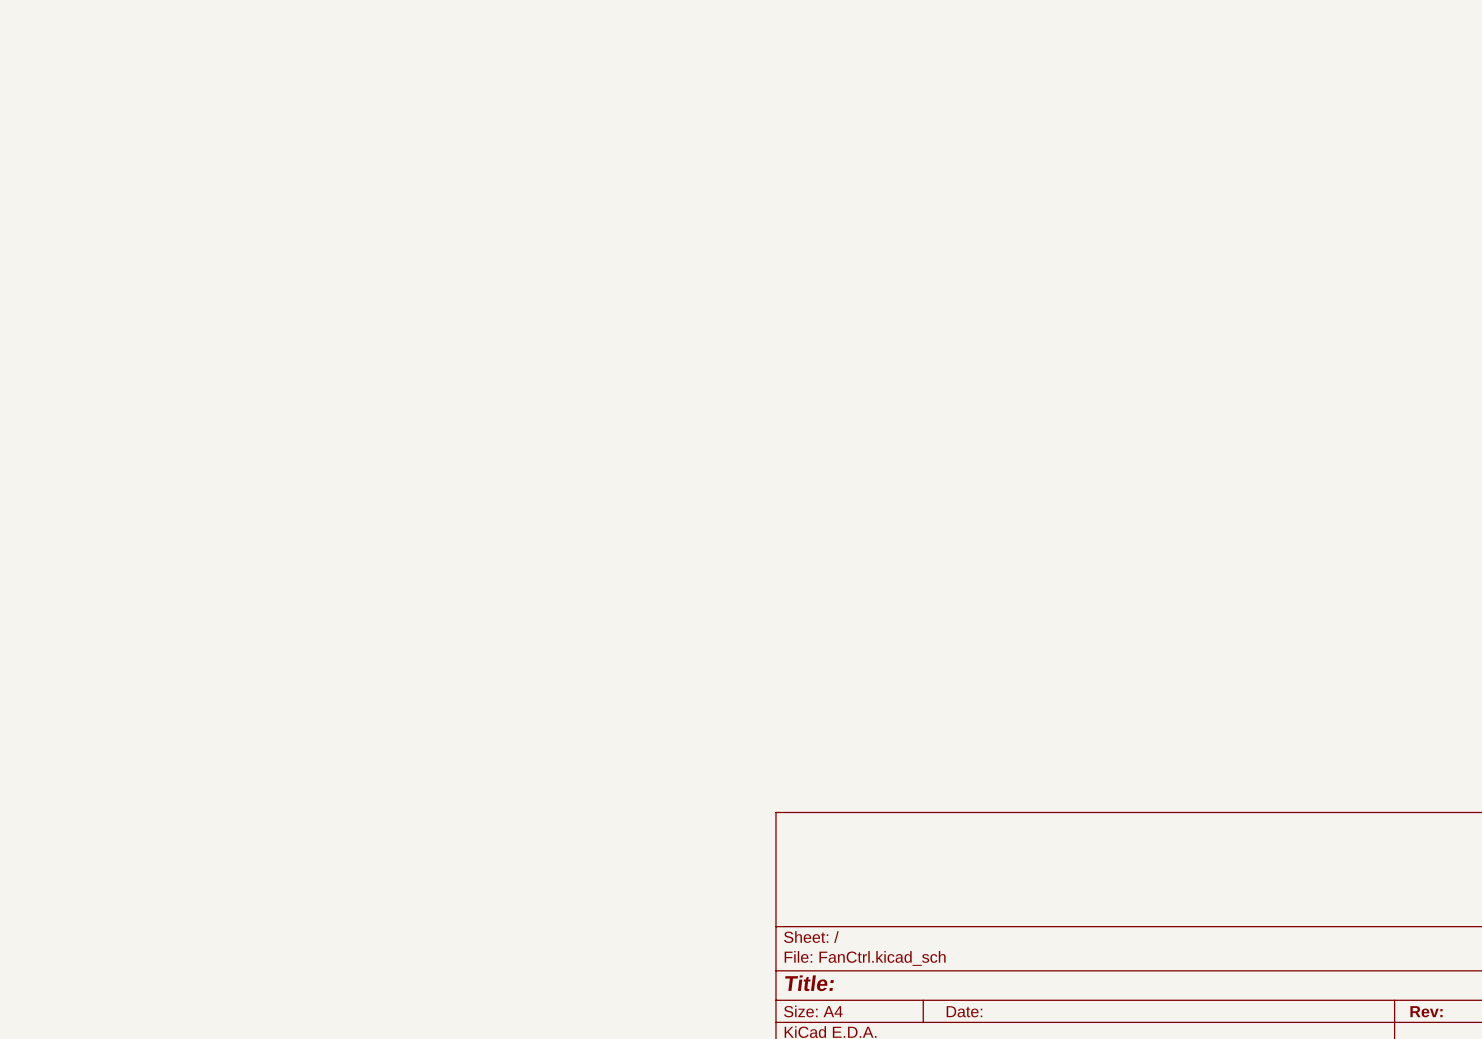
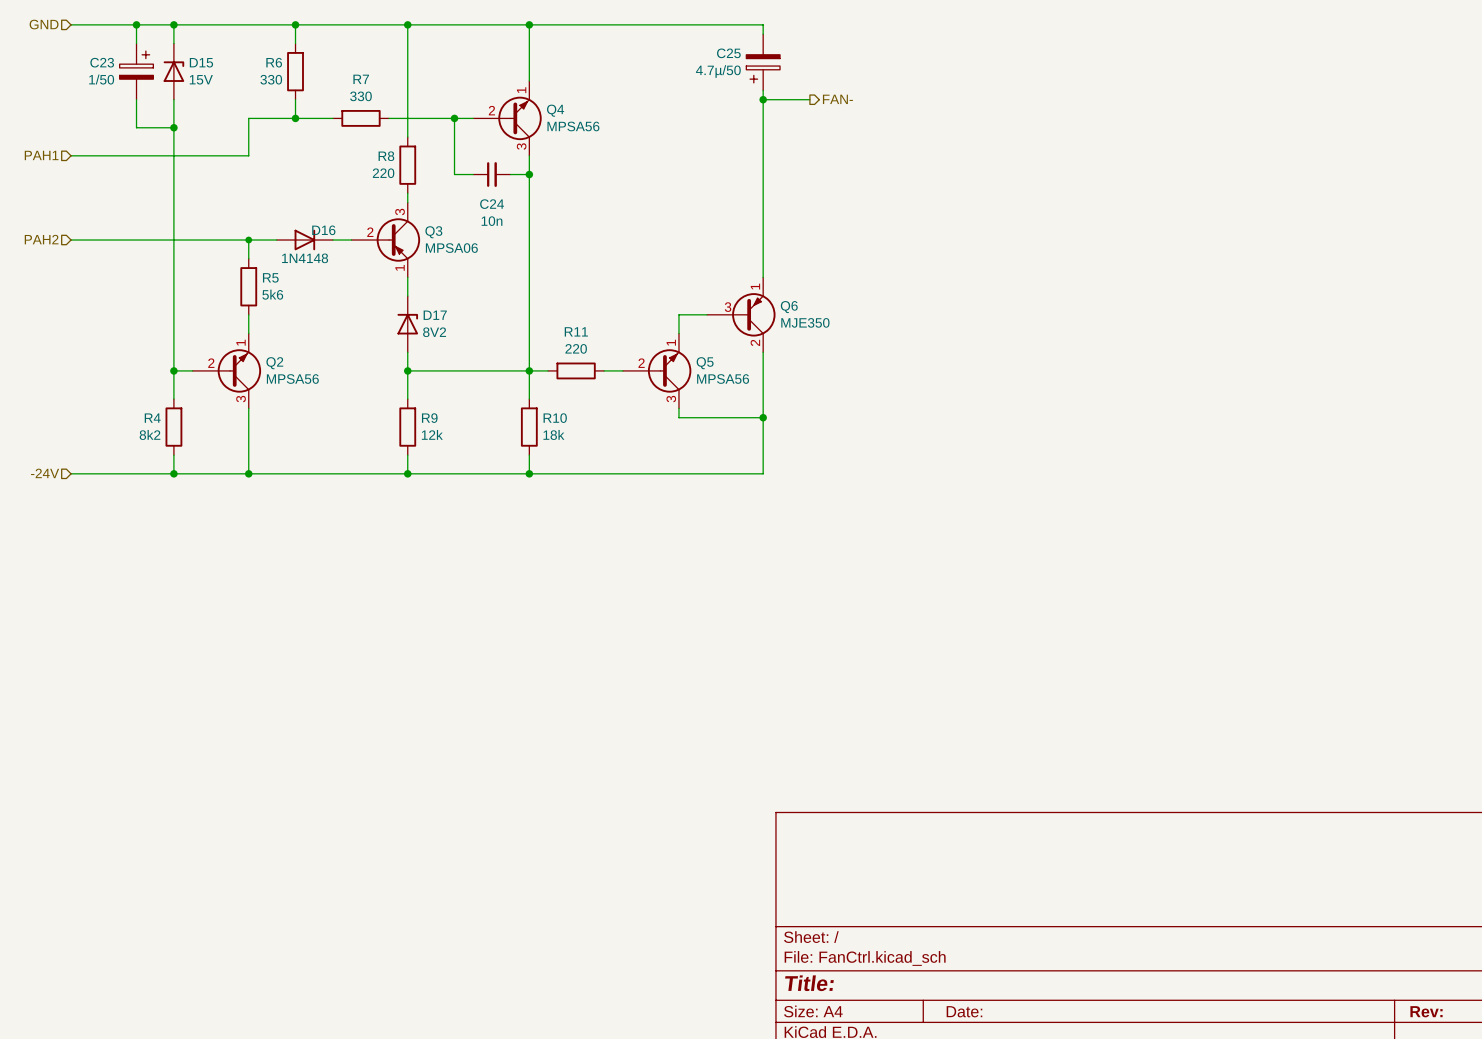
hierarchical label: none -> GND (44, 24)
wire: none -> (71, 24) (763, 24) (763, 34)
wire: none -> (136, 24) (136, 43)
junction: none -> (136, 24)
wire: none -> (173, 24) (173, 43)
junction: none -> (173, 24)
wire: none -> (295, 24) (295, 43)
junction: none -> (295, 24)
wire: none -> (407, 24) (407, 137)
junction: none -> (407, 24)
wire: none -> (529, 24) (529, 81)
junction: none -> (529, 24)
C25: none -> 4.7µ/50 (763, 62)
C23: none -> 1/50 (136, 71)
D15: none -> 15V (173, 71)
R6: none -> 330 (295, 71)
wire: none -> (763, 90) (763, 277)
wire: none -> (136, 99) (136, 127) (173, 127)
wire: none -> (173, 99) (173, 399)
wire: none -> (295, 99) (295, 118)
wire: none -> (763, 99) (809, 99)
junction: none -> (763, 99)
hierarchical label: none -> FAN- (837, 99)
junction: none -> (295, 118)
wire: none -> (332, 118) (248, 118) (248, 155) (71, 155)
R7: none -> 330 (360, 118)
wire: none -> (389, 118) (473, 118)
wire: none -> (454, 118) (454, 174) (473, 174)
junction: none -> (454, 118)
Q4: none -> MPSA56 (507, 118)
junction: none -> (173, 127)
hierarchical label: none -> PAH1 (41, 155)
wire: none -> (529, 155) (529, 399)
R8: none -> 220 (407, 165)
C24: none -> 10n (491, 174)
wire: none -> (510, 174) (529, 174)
junction: none -> (529, 174)
wire: none -> (407, 193) (407, 202)
hierarchical label: none -> PAH2 (41, 239)
wire: none -> (71, 240) (276, 240)
wire: none -> (248, 240) (248, 258)
junction: none -> (248, 240)
D16: none -> 1N4148 (304, 240)
wire: none -> (332, 240) (351, 240)
Q3: none -> MPSA06 (385, 240)
wire: none -> (407, 277) (407, 296)
R5: none -> 5k6 (248, 286)
wire: none -> (248, 314) (248, 333)
wire: none -> (707, 314) (678, 314) (678, 333)
Q6: none -> MJE350 (741, 314)
D17: none -> 8V2 (407, 324)
wire: none -> (407, 352) (407, 399)
wire: none -> (763, 352) (763, 473) (71, 473)
wire: none -> (173, 370) (192, 370)
junction: none -> (173, 370)
Q2: none -> MPSA56 (226, 370)
wire: none -> (407, 370) (548, 370)
junction: none -> (407, 370)
junction: none -> (529, 370)
R11: none -> 220 (576, 370)
wire: none -> (604, 370) (622, 370)
Q5: none -> MPSA56 (657, 370)
wire: none -> (248, 408) (248, 473)
wire: none -> (678, 408) (678, 417) (763, 417)
junction: none -> (763, 417)
R4: none -> 8k2 (173, 427)
R9: none -> 12k (407, 427)
R10: none -> 18k (529, 427)
wire: none -> (173, 455) (173, 473)
wire: none -> (407, 455) (407, 473)
wire: none -> (529, 455) (529, 473)
hierarchical label: none -> -24V (45, 473)
junction: none -> (173, 473)
junction: none -> (248, 473)
junction: none -> (407, 473)
junction: none -> (529, 473)

